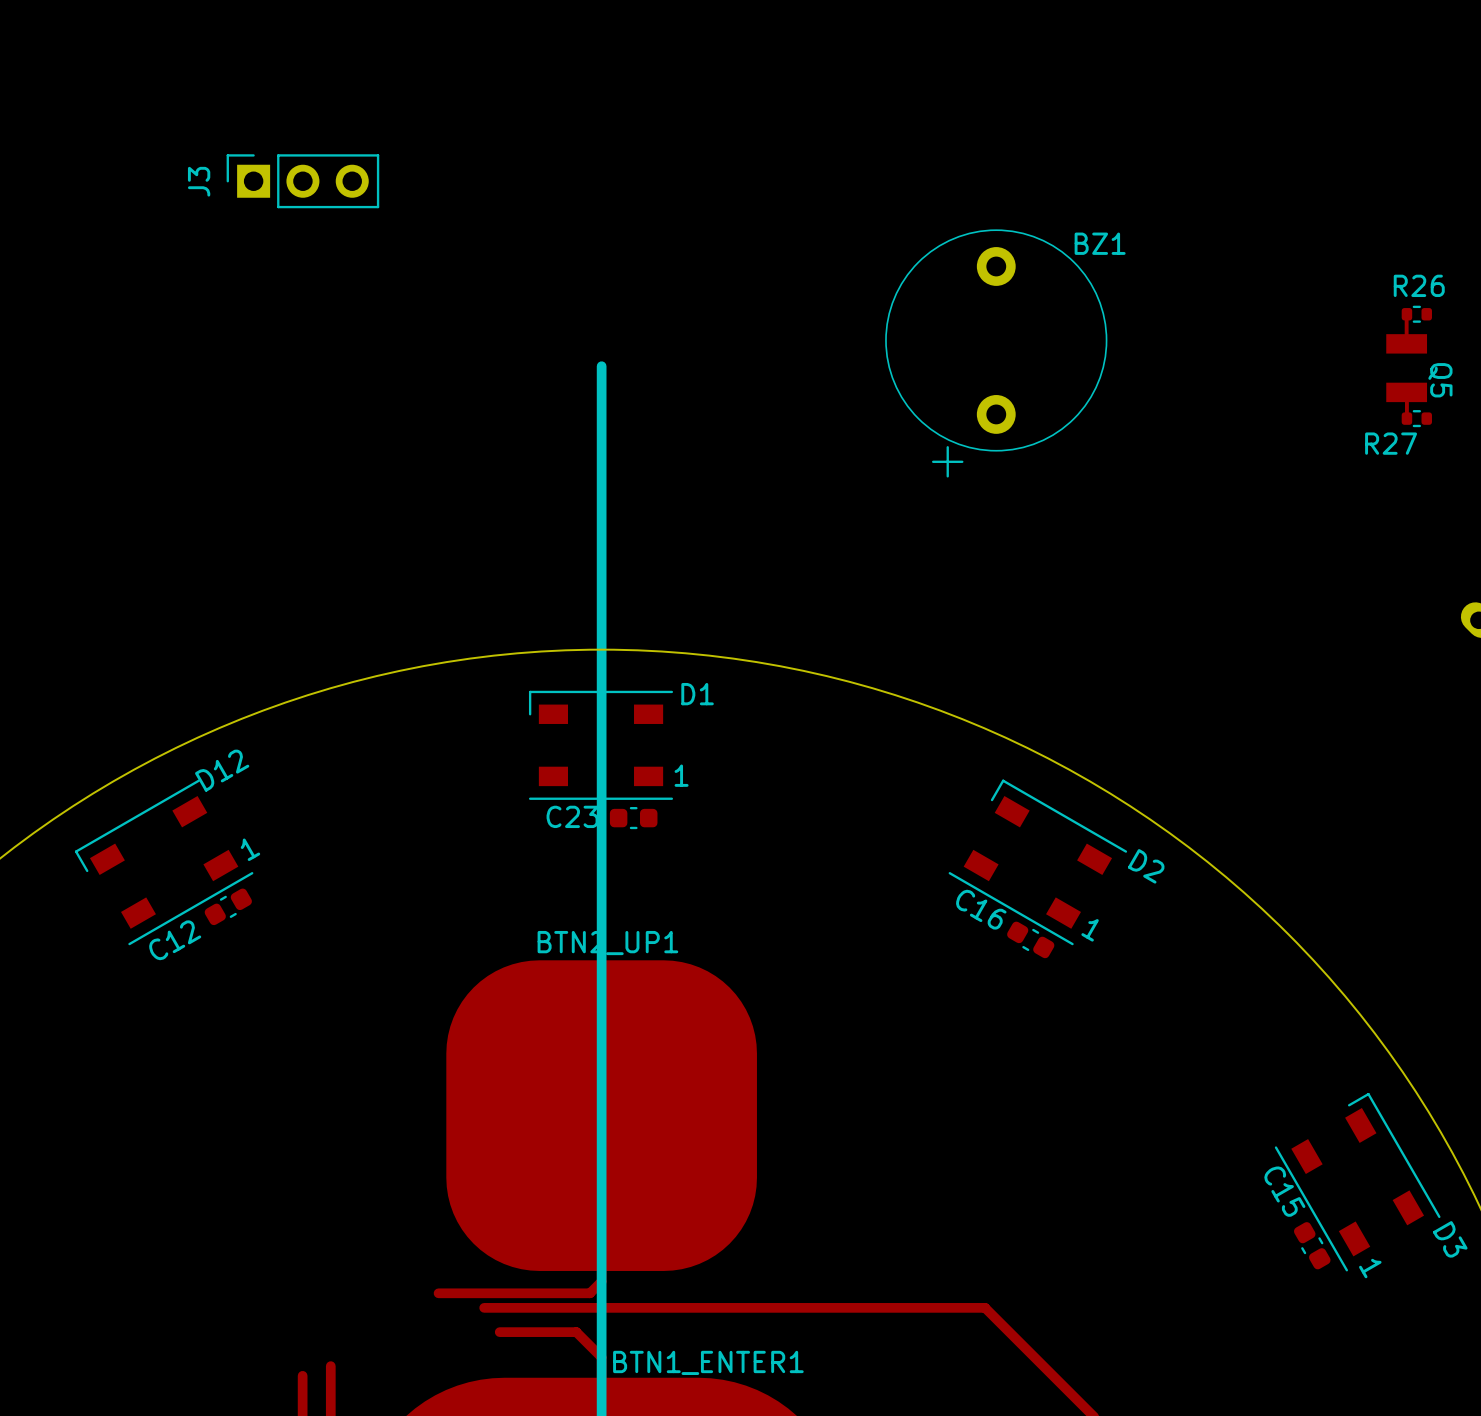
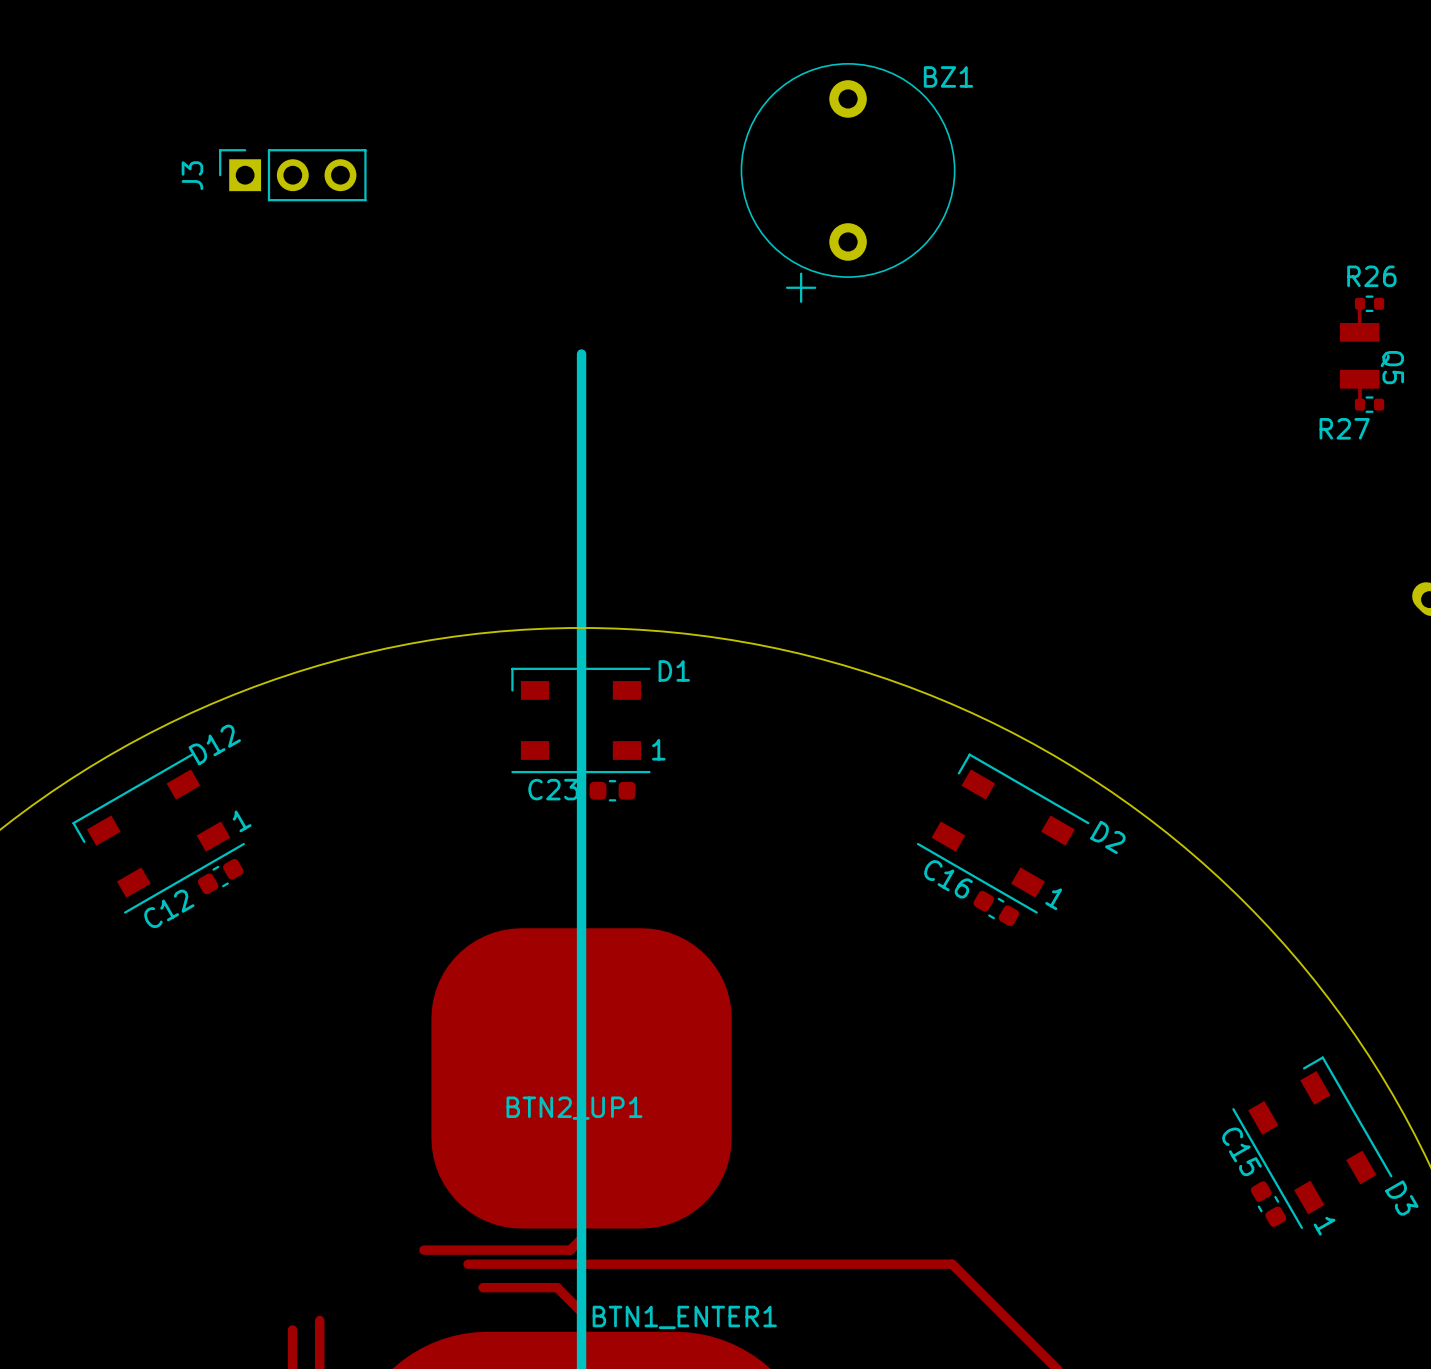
BZ1 footprint: [885, 229, 1108, 478] -> [740, 63, 956, 303]
BTN2_UP1 name position: BTN2_UP1 (607, 943) -> BTN2_UP1 (574, 1108)

